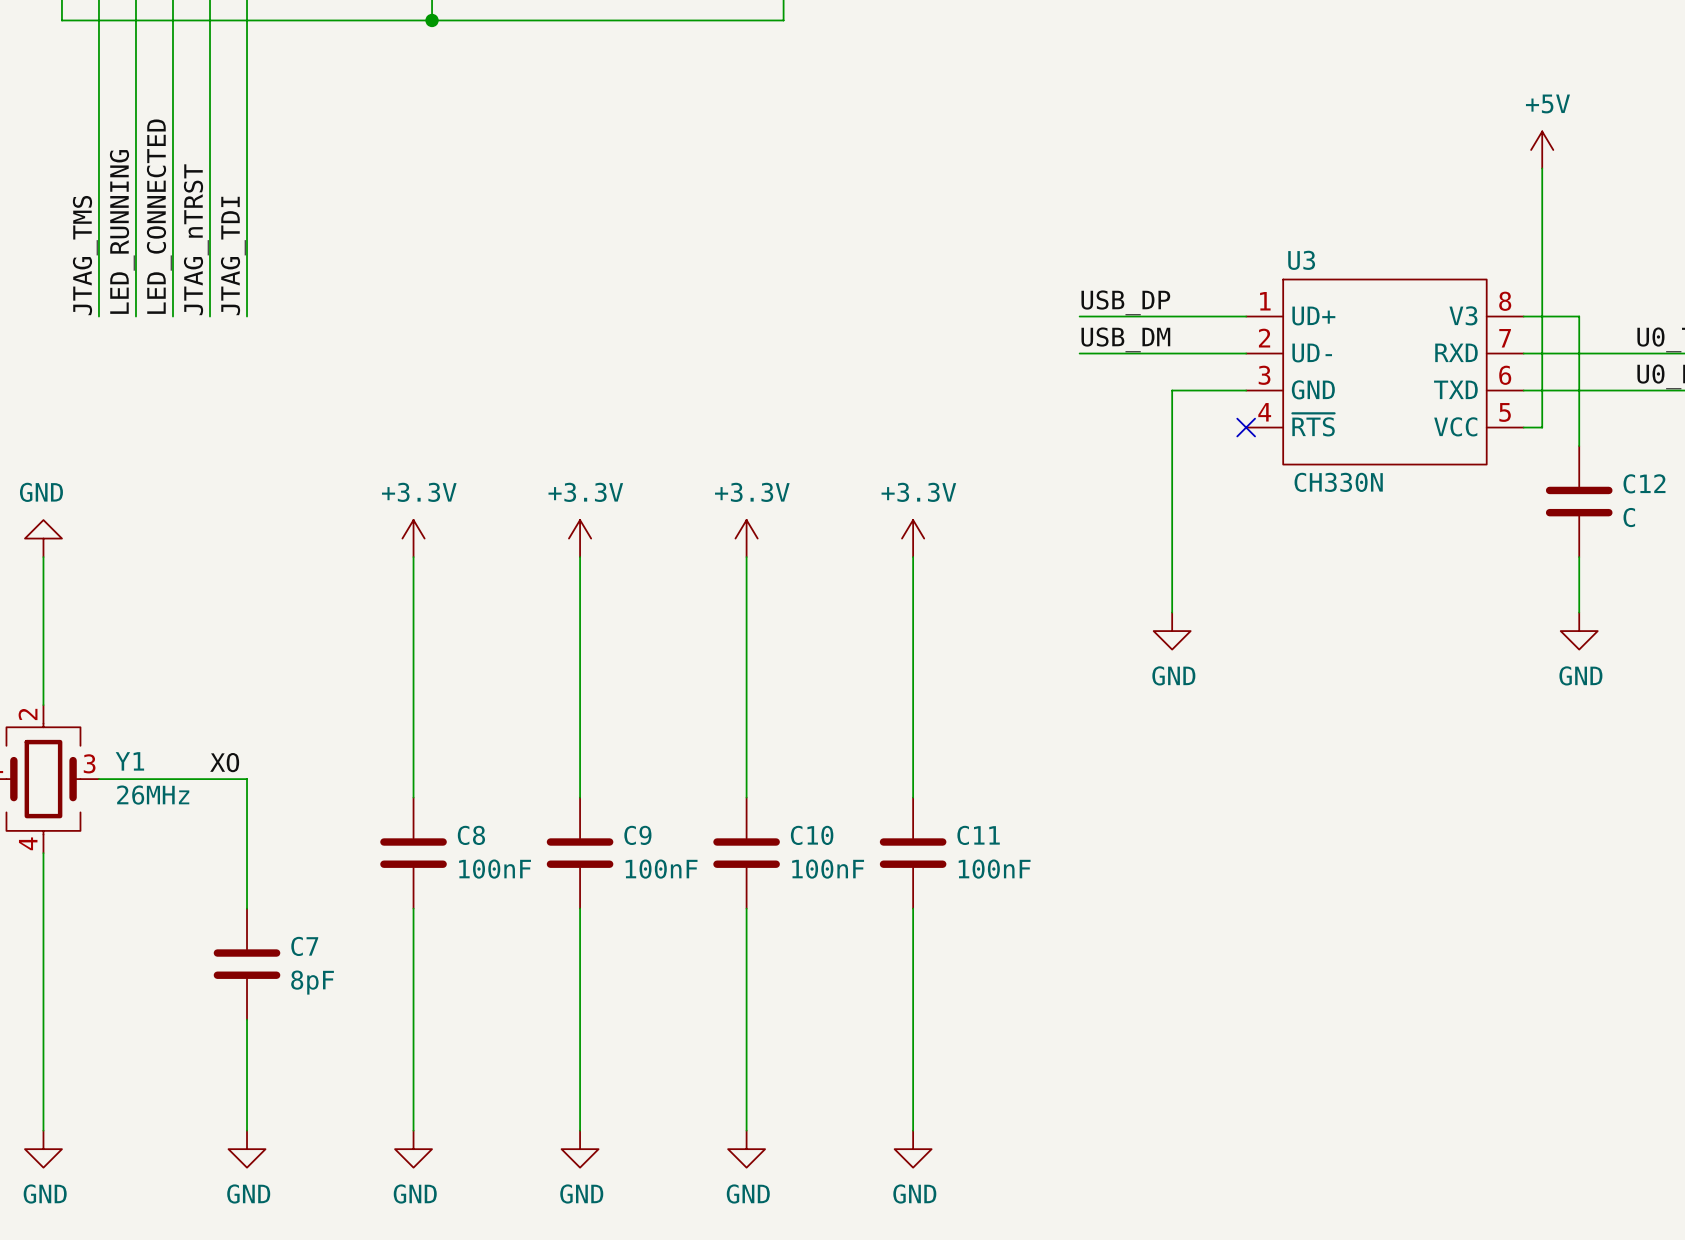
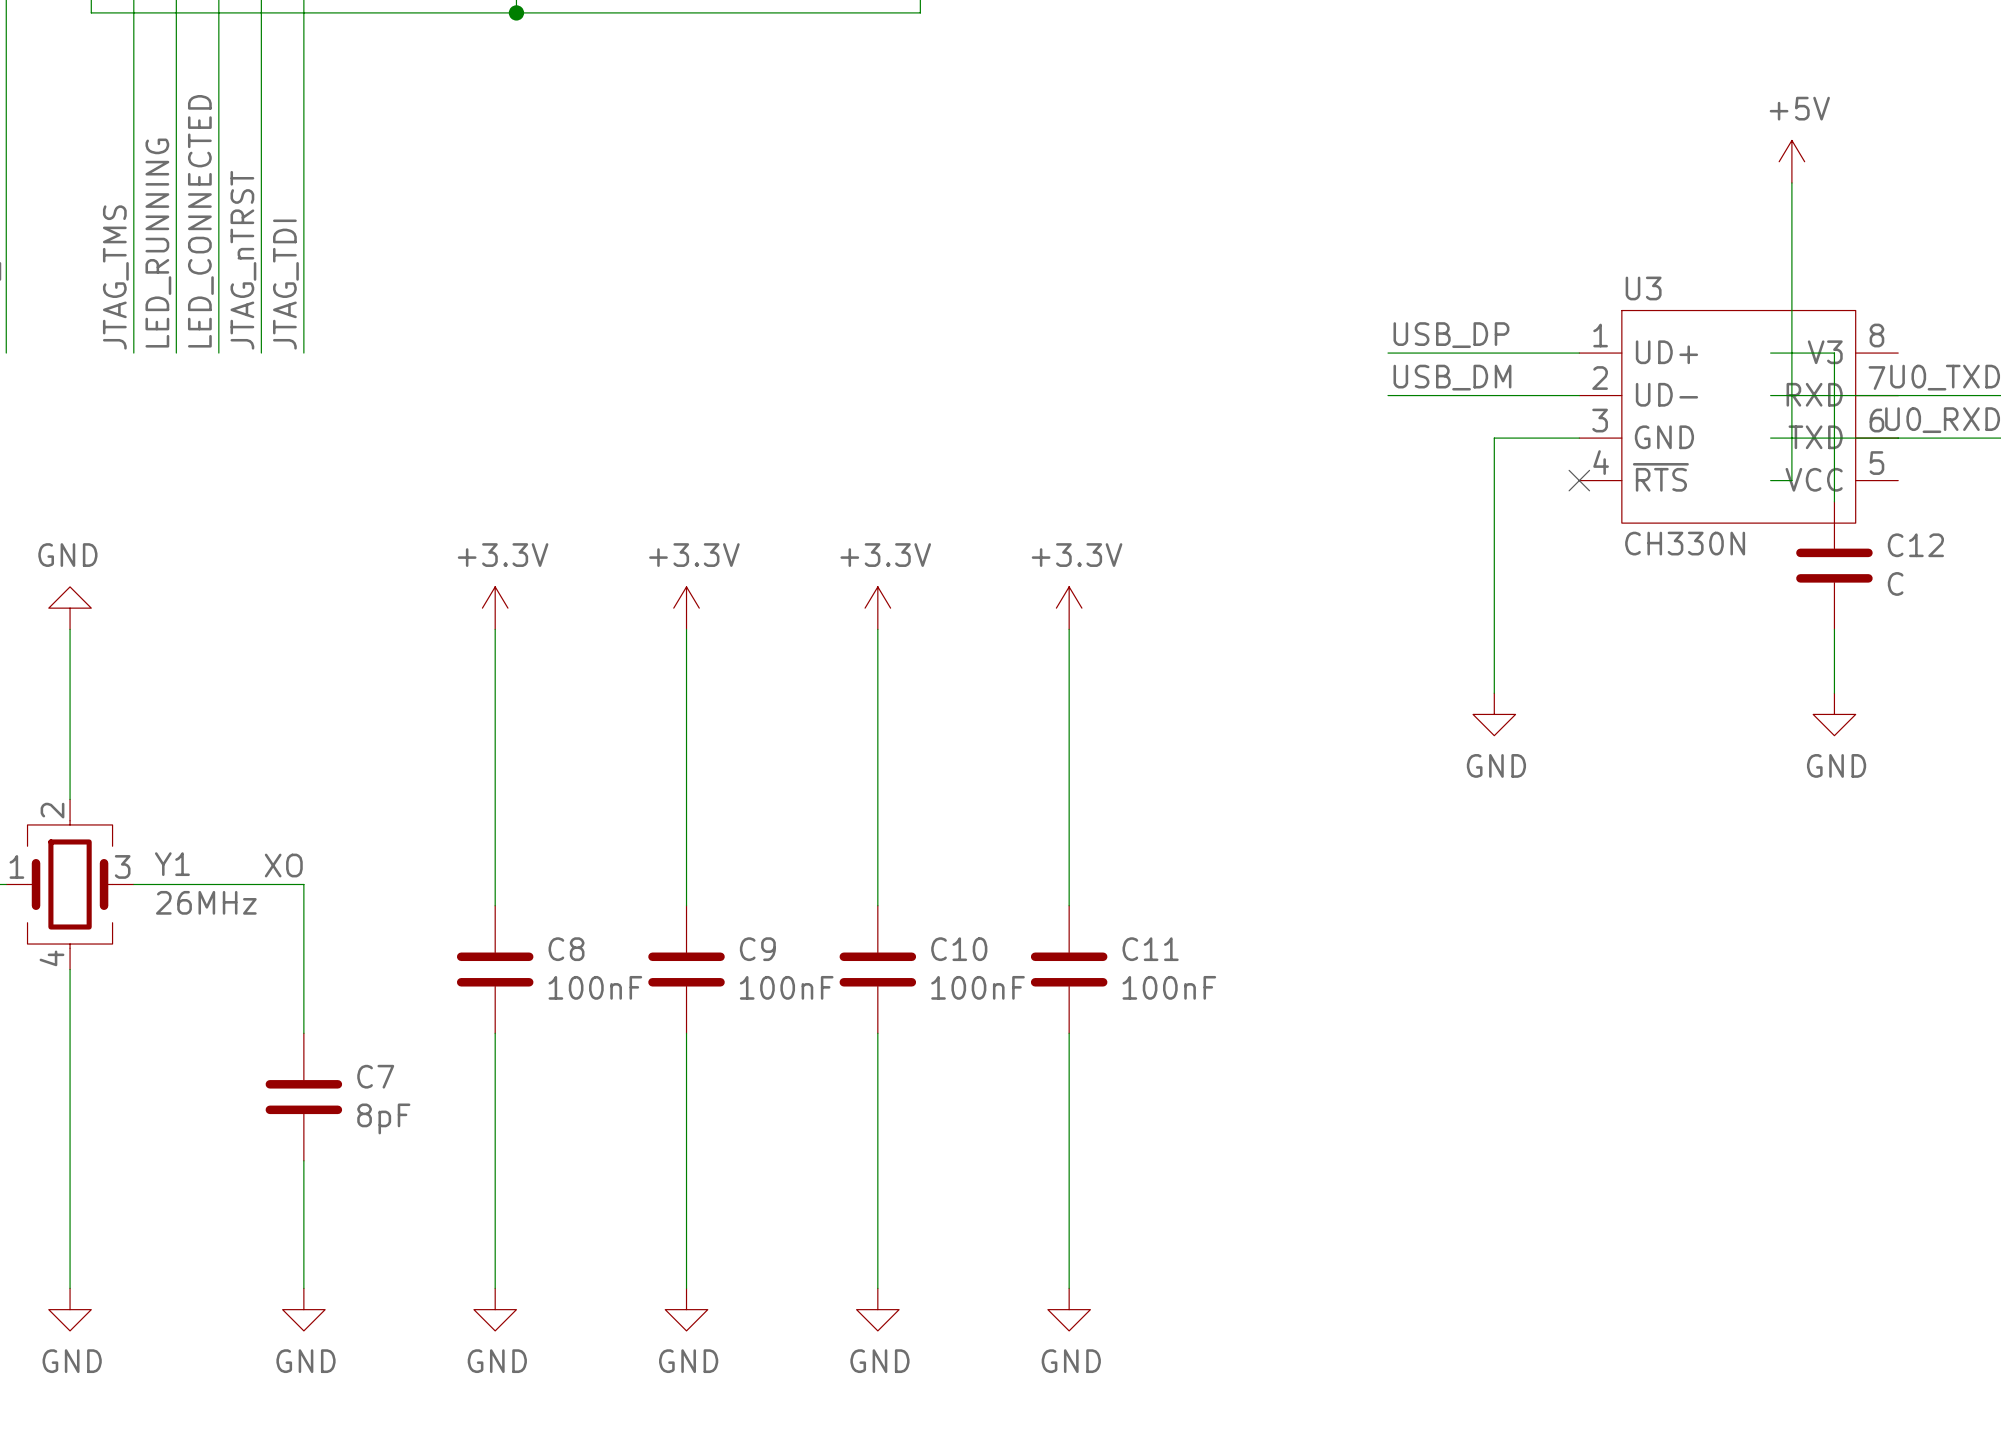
label position: USB_DP (1125, 302) -> USB_DP (1451, 335)
wire: (1079, 316) (1190, 316) -> (1451, 353) (1579, 353)
label position: USB_DM (1125, 339) -> USB_DM (1452, 377)
wire: (1079, 353) (1190, 353) -> (1451, 395) (1579, 395)
U3 position: (1384, 372) -> (1738, 416)
wire: (1246, 390) (1172, 390) (1172, 612) -> (1579, 438) (1494, 438) (1494, 693)
no-connect mark: (1246, 427) -> none
no-connect mark: none -> (1579, 480)
power symbol position: GND (1172, 631) -> GND (1494, 714)

